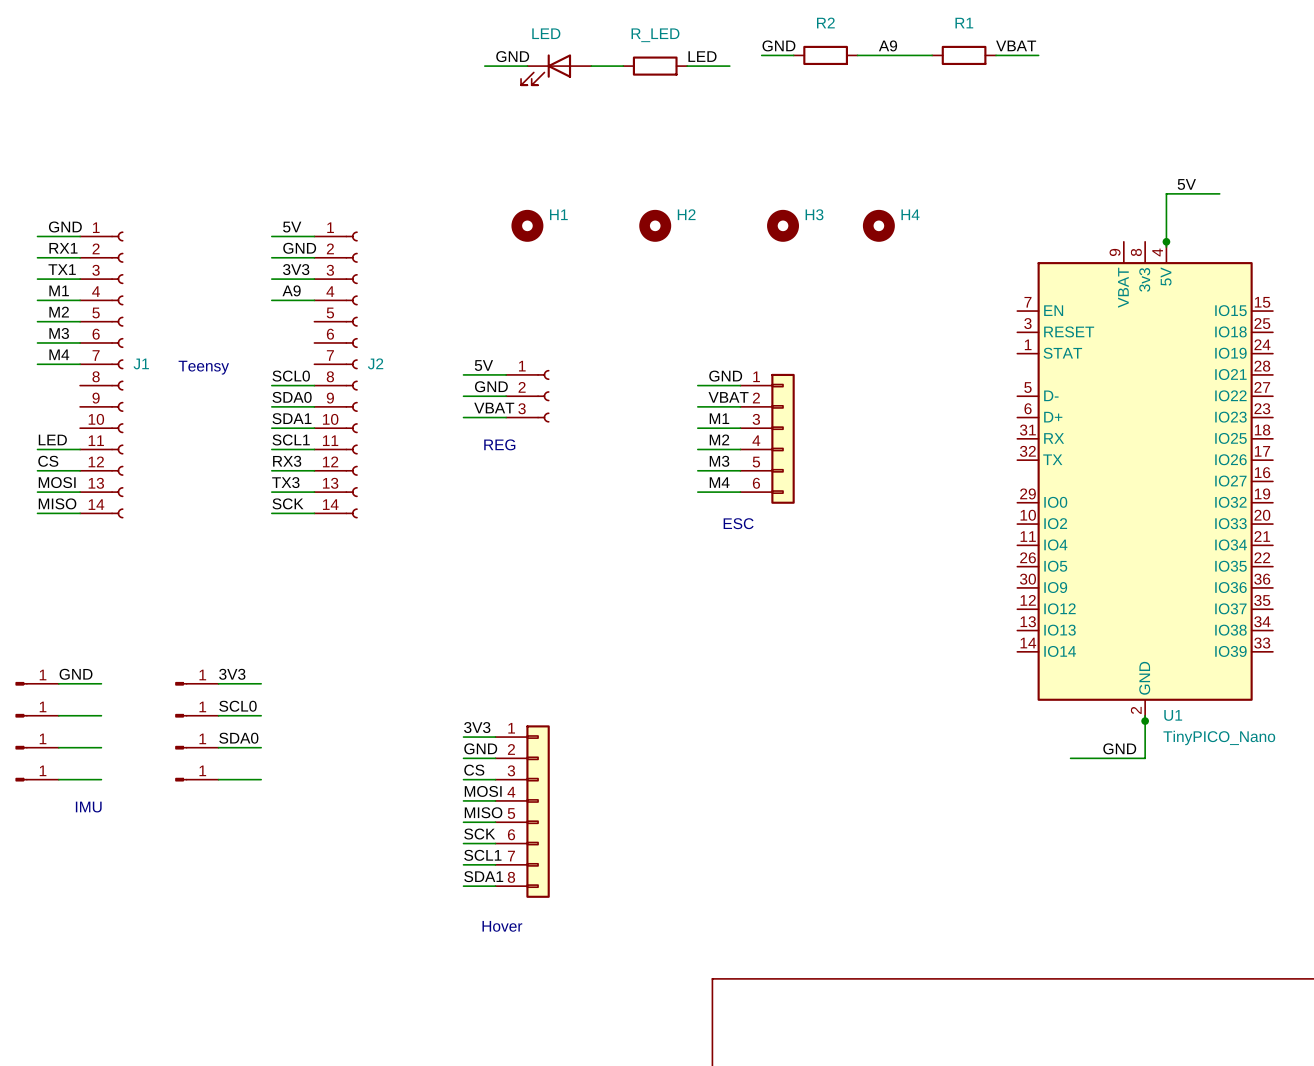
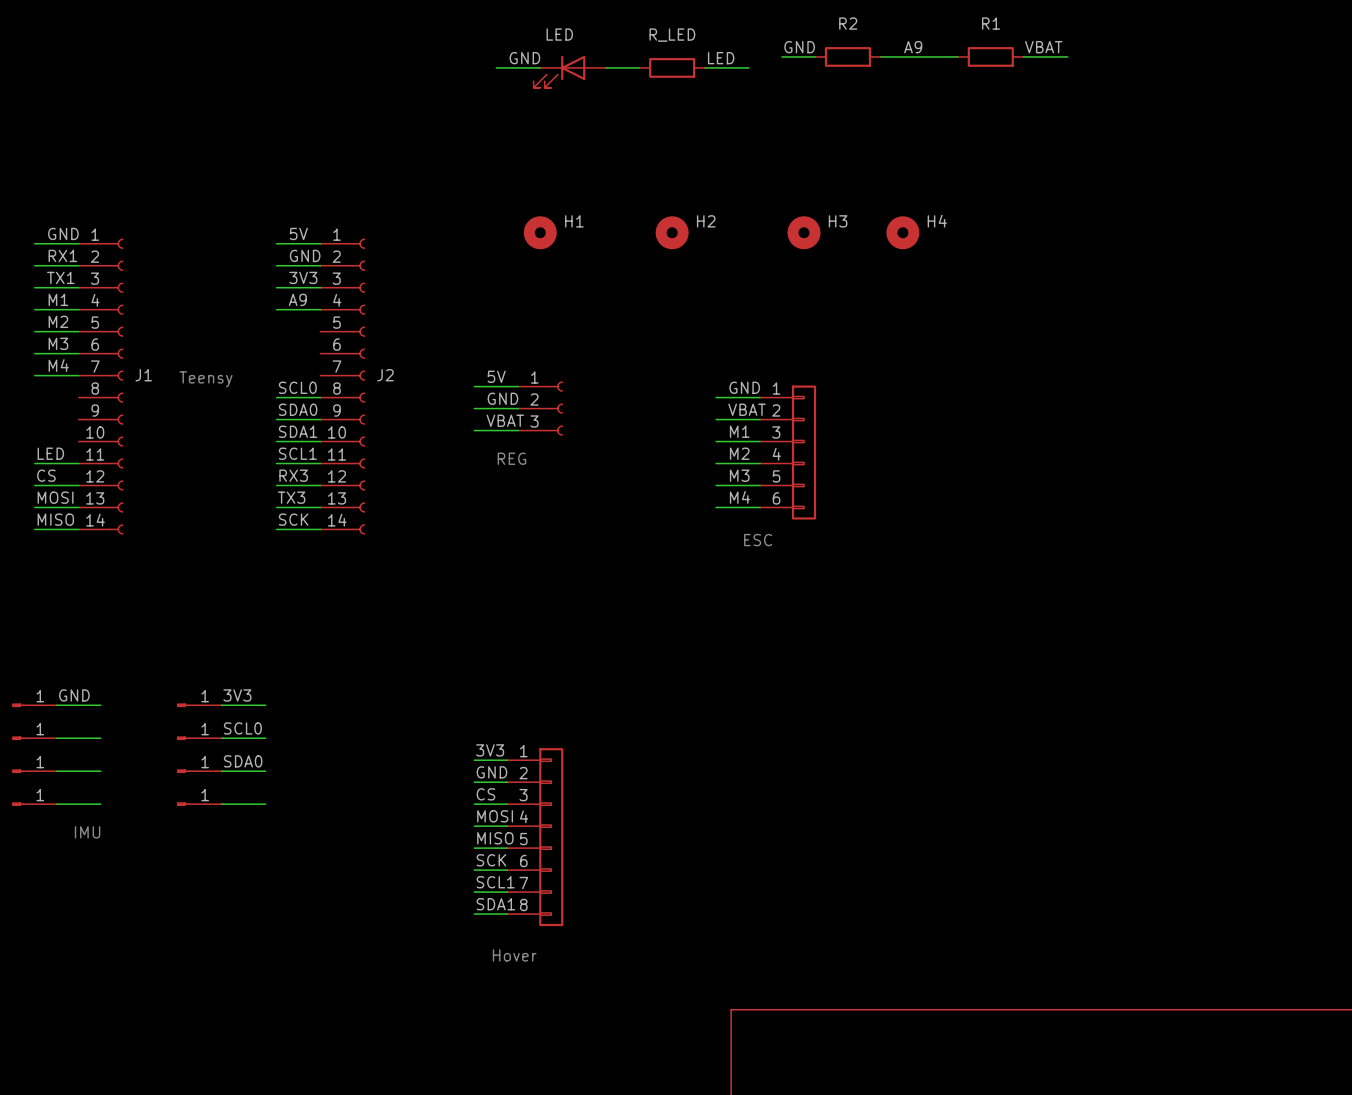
label: 5V (1186, 184) -> none
wire: (1219, 193) (1166, 193) (1166, 247) -> none
junction: (1166, 241) -> none
U1: TinyPICO_Nano (1145, 481) -> none
wire: (1145, 715) (1145, 758) (1070, 758) -> none
junction: (1145, 721) -> none
label: GND (1119, 748) -> none

